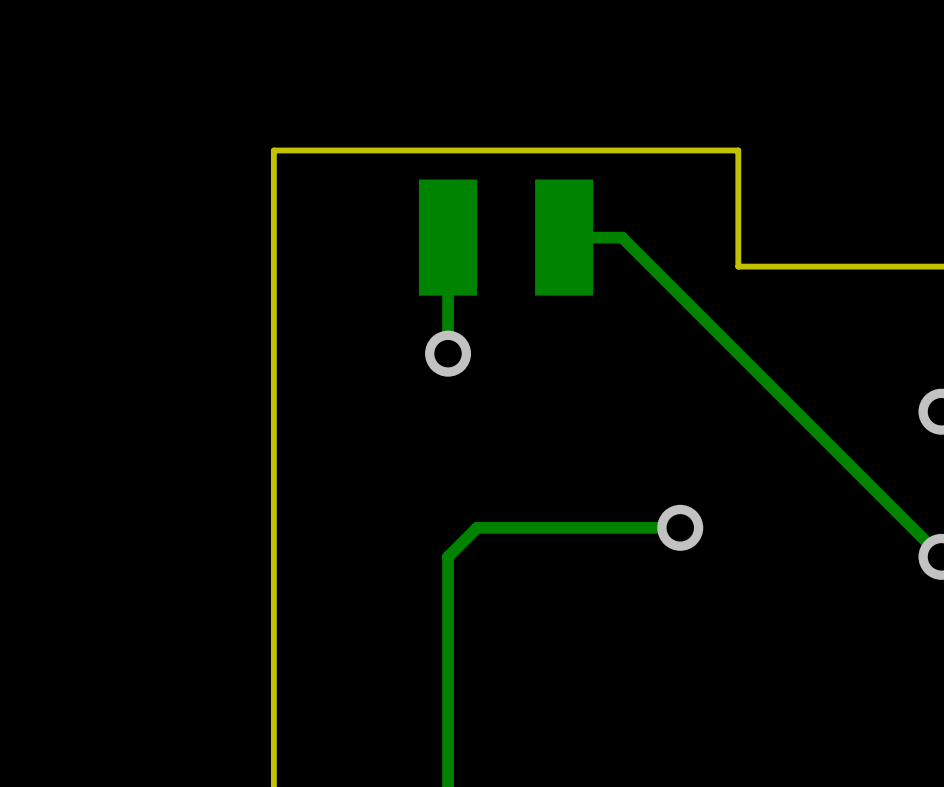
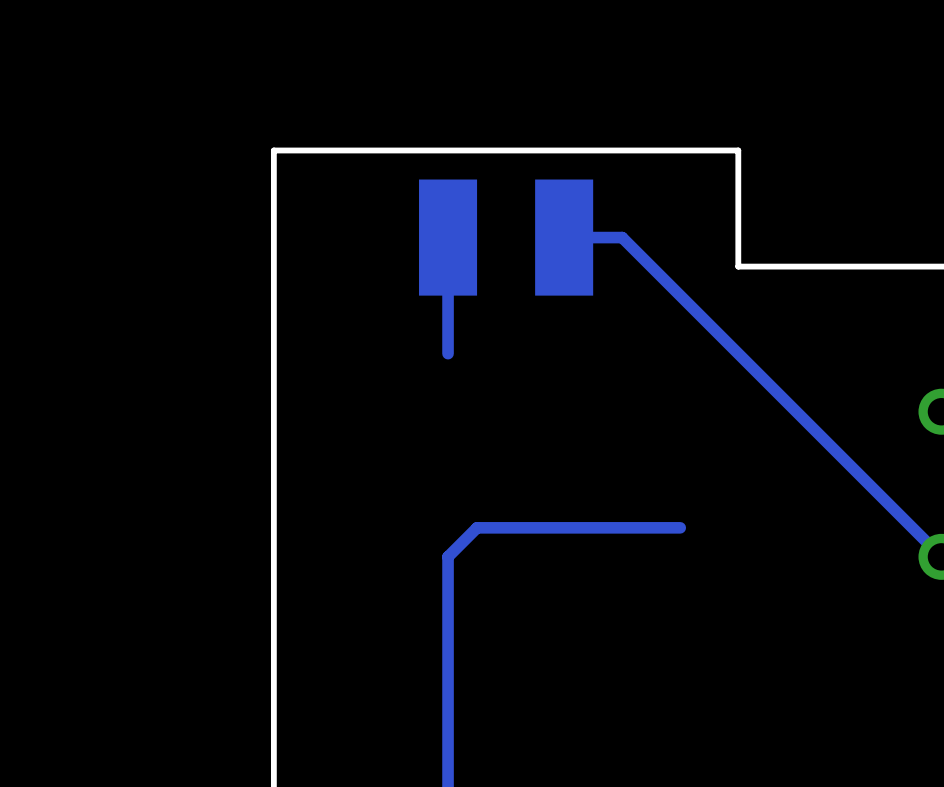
via: (448, 353) -> none
via: (680, 527) -> none

